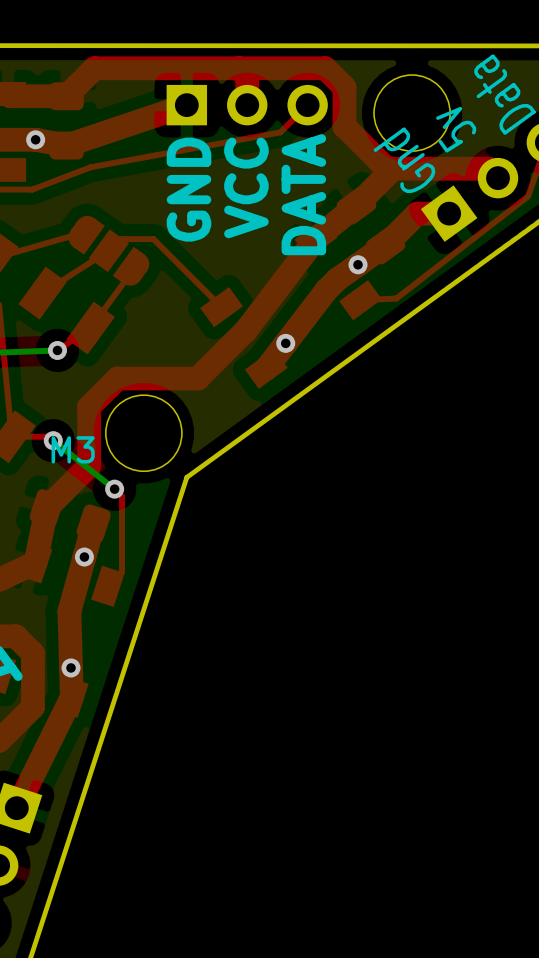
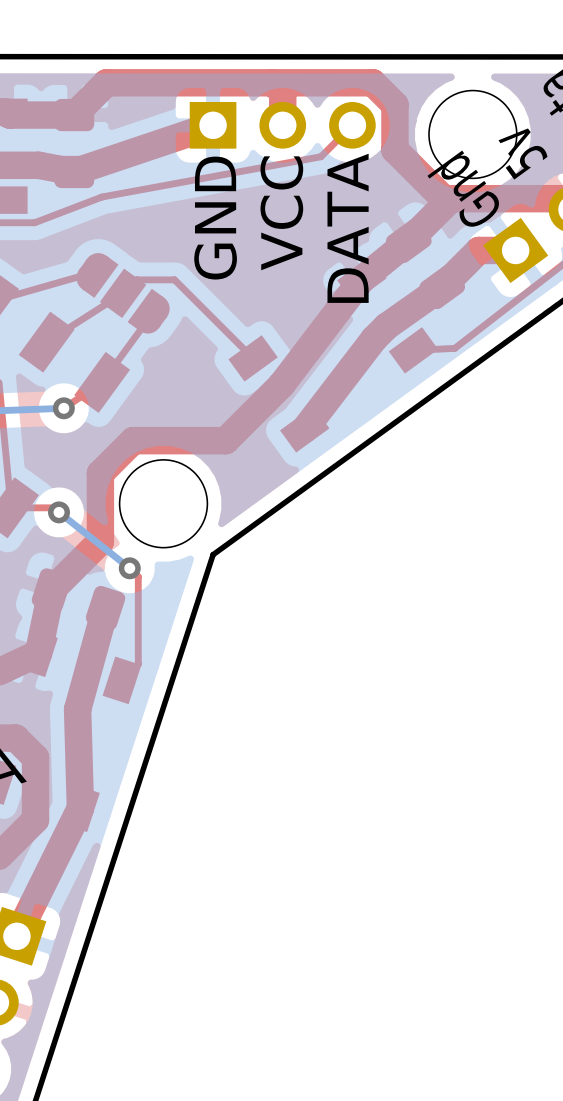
via: (35, 139) -> none
via: (358, 264) -> none
via: (285, 343) -> none
M3 name: M3 (73, 449) -> none
via: (84, 557) -> none
via: (71, 667) -> none

